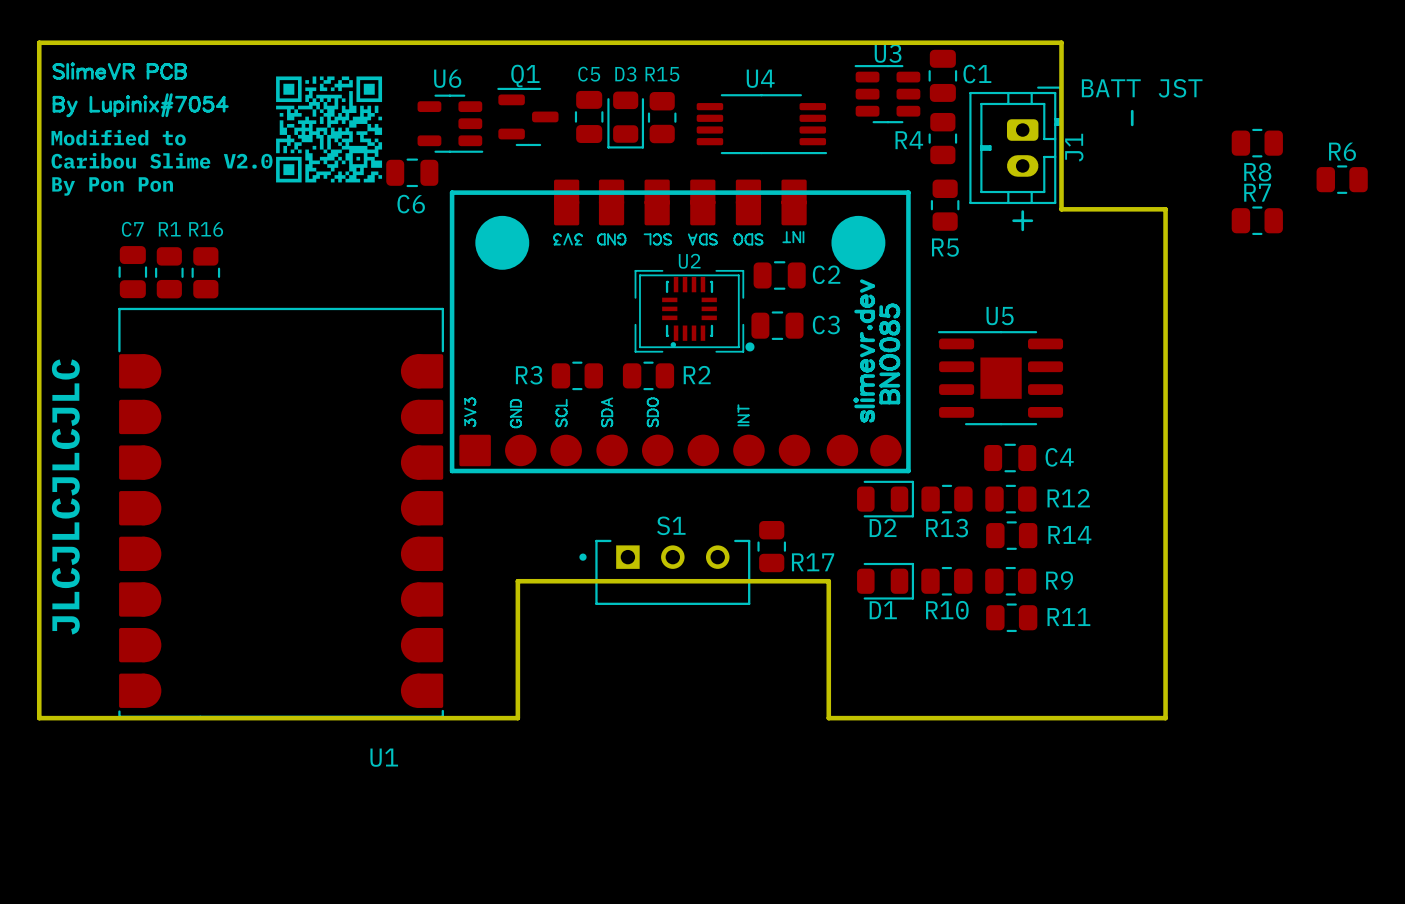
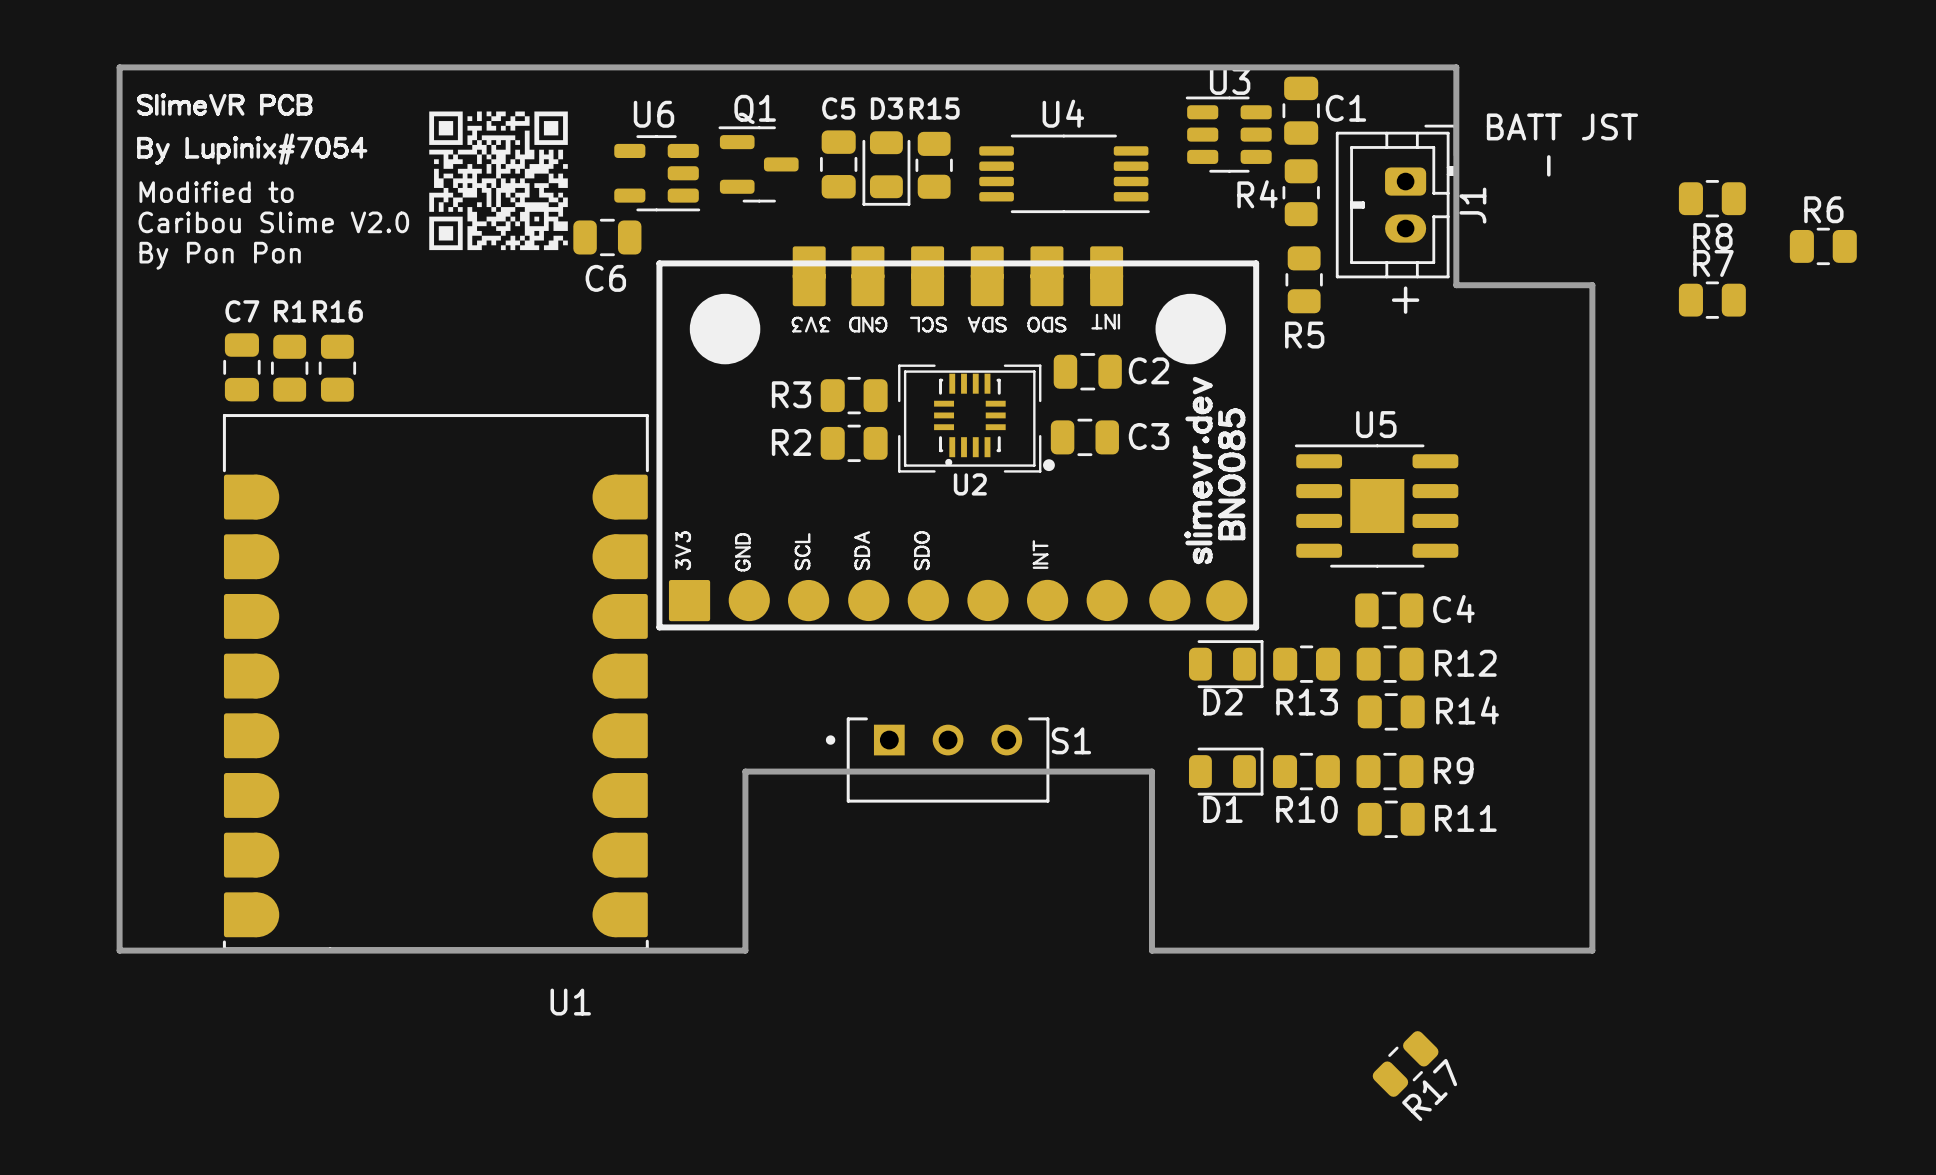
U2 name position: U2 (689, 261) -> U2 (970, 484)
R3 position: (577, 375) -> (854, 395)
R2 position: (648, 375) -> (854, 443)
R2 name position: R2 (697, 375) -> R2 (791, 442)
text: JLCJLCJLCJLC (65, 496) -> none
S1 name position: S1 (671, 525) -> S1 (1071, 740)
R17 rotation: 0° (771, 546) -> 45° clockwise (1405, 1063)
R17 position: (771, 546) -> (1405, 1063)

